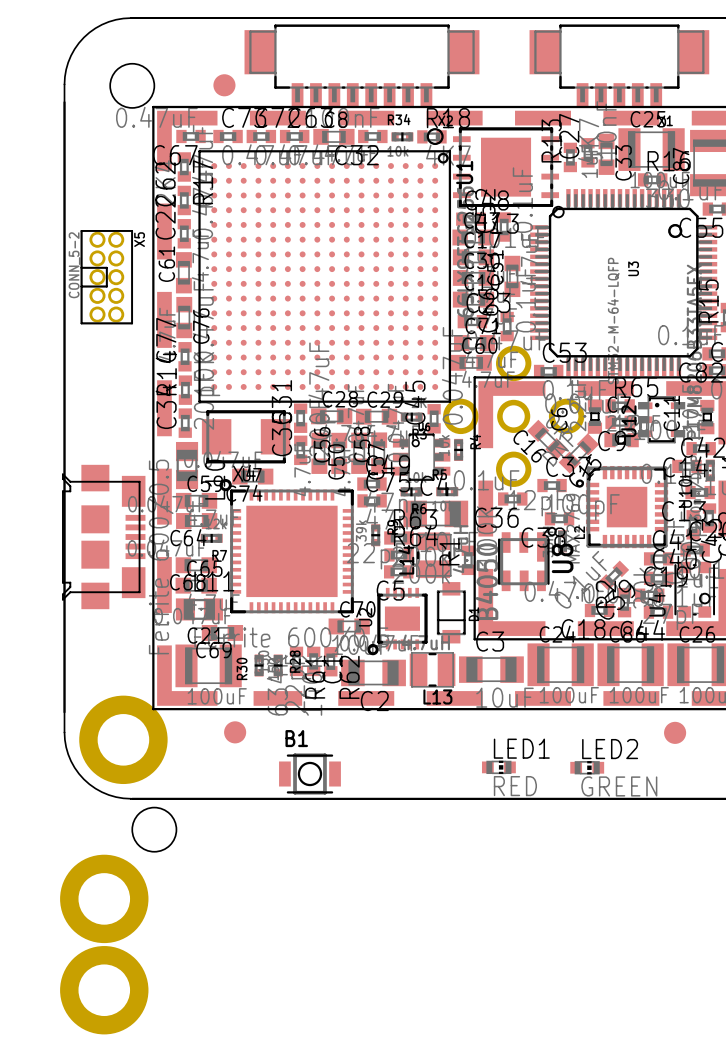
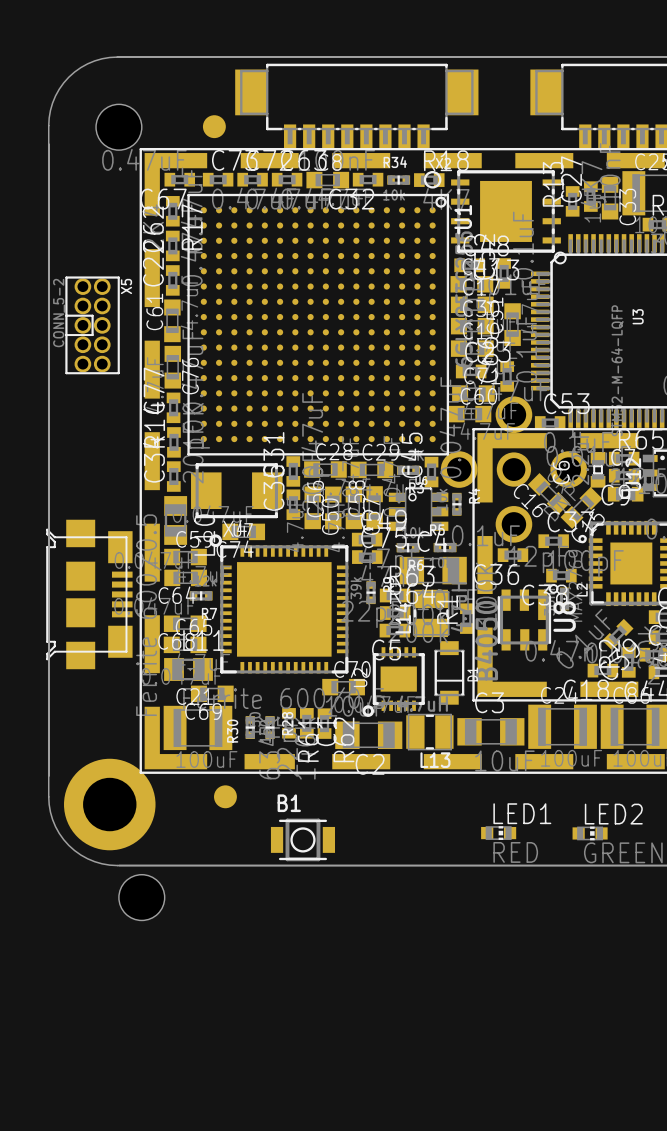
part: (104, 898) -> none
part: (104, 990) -> none

